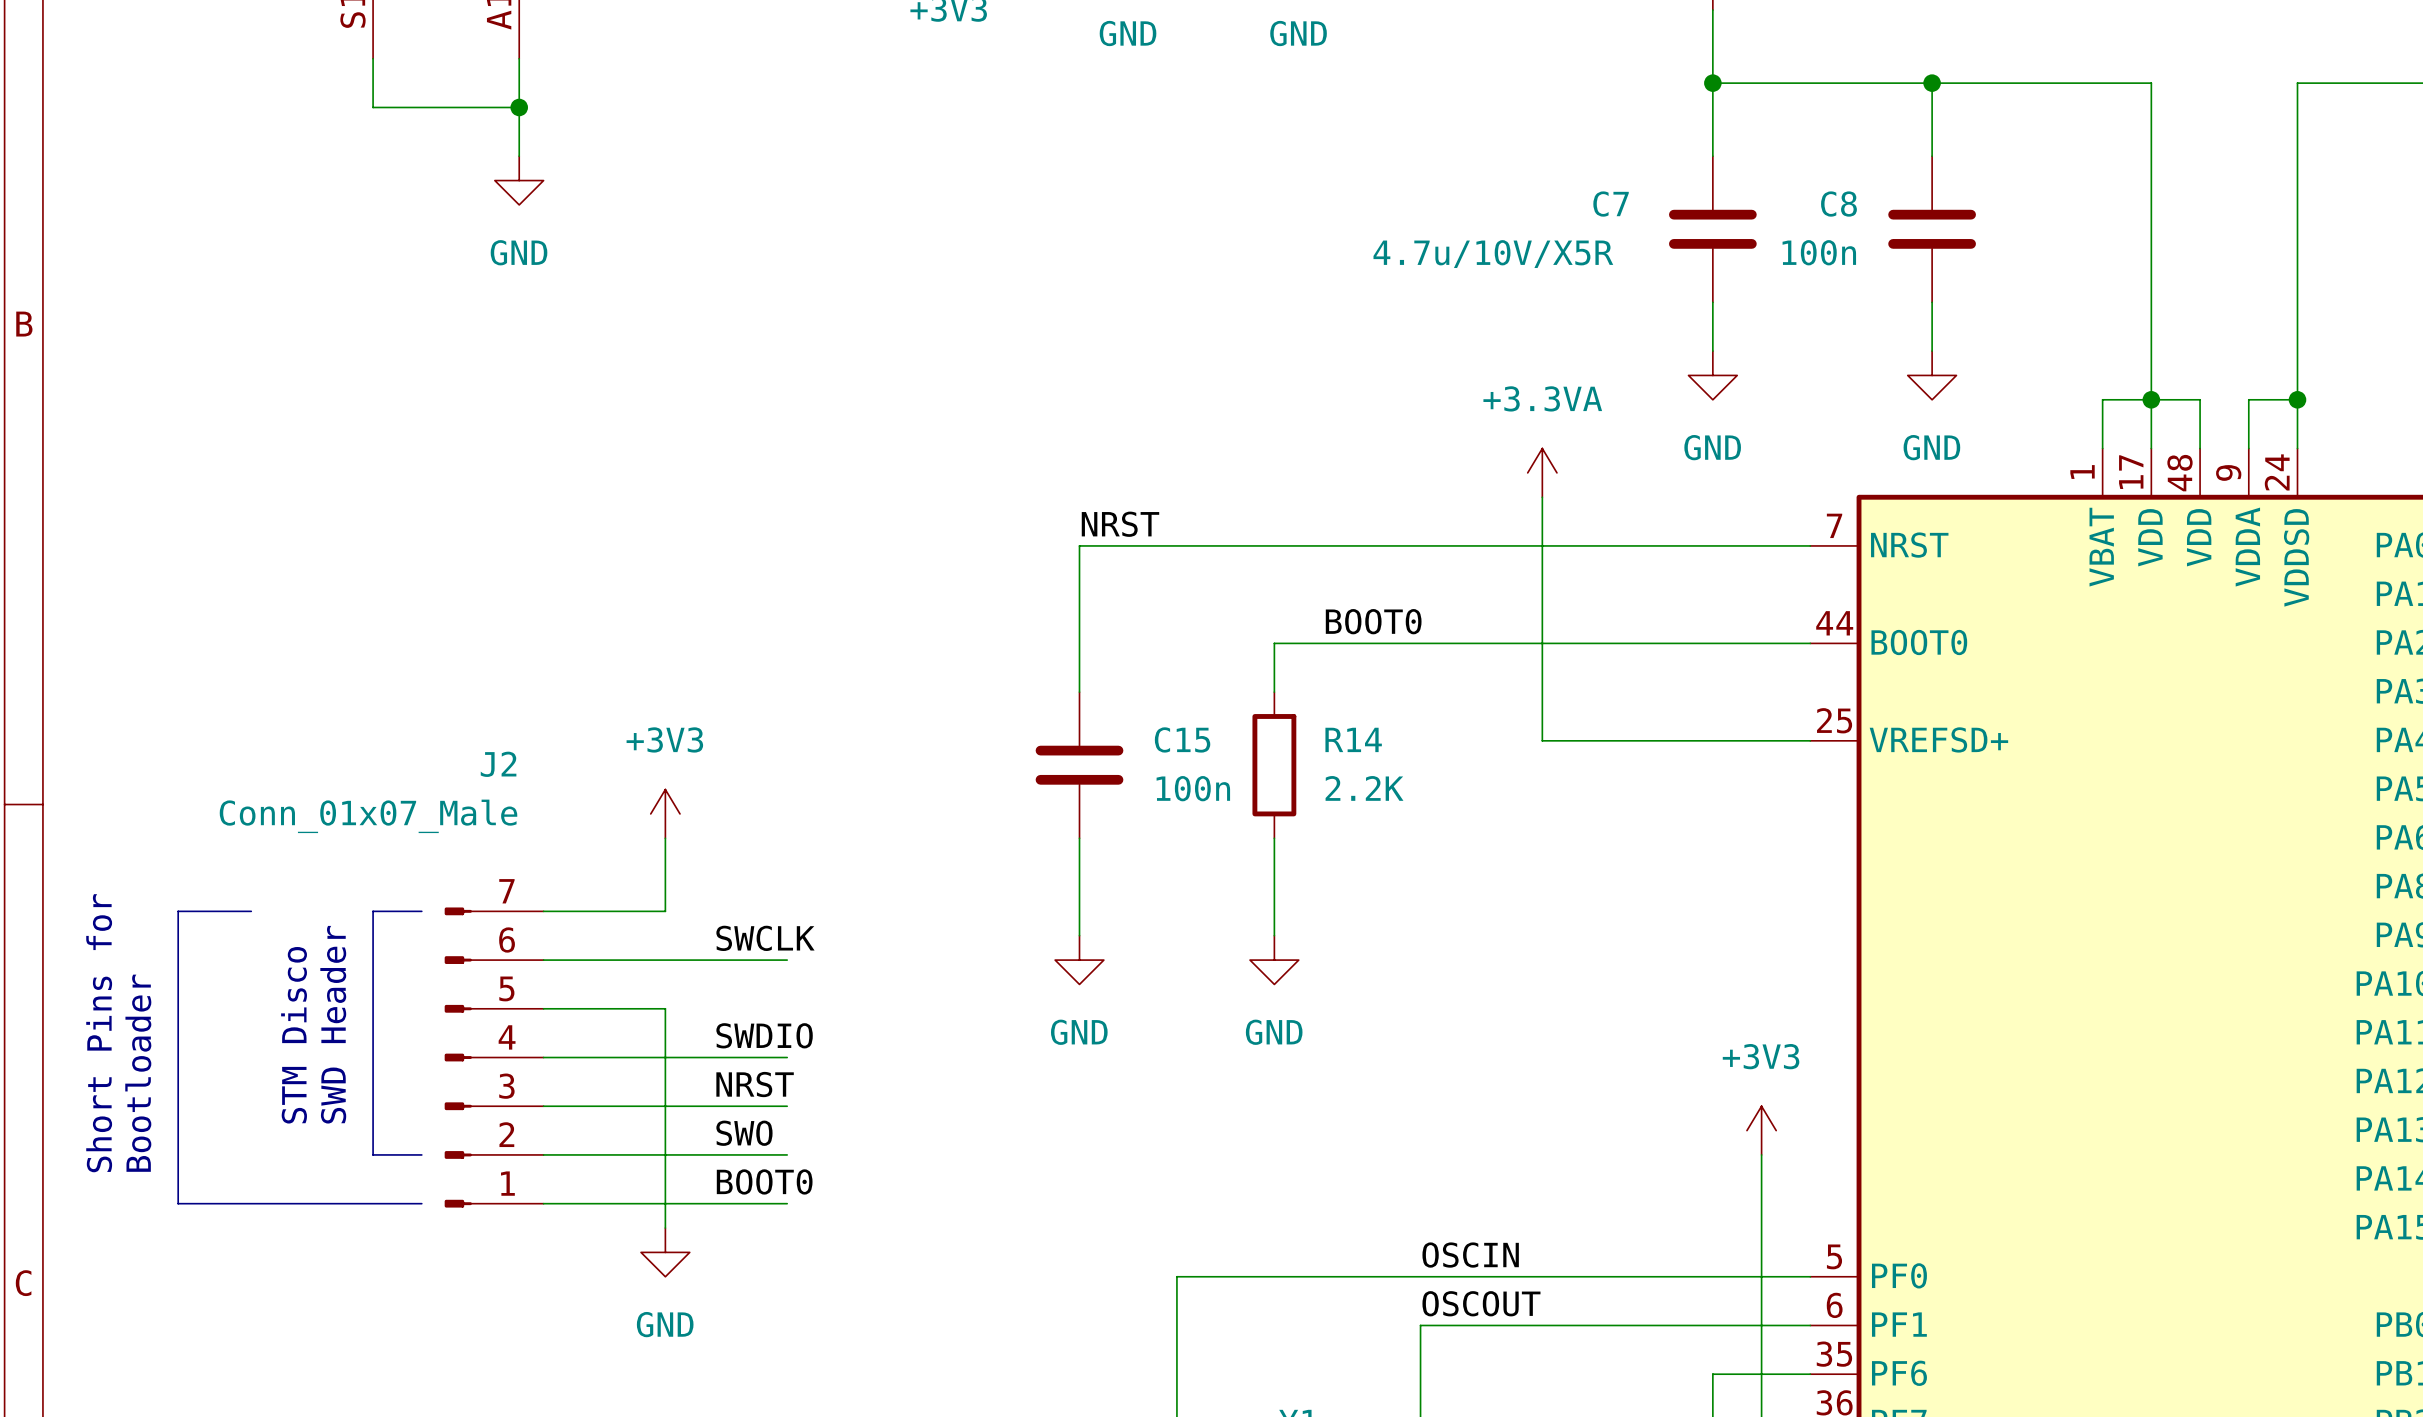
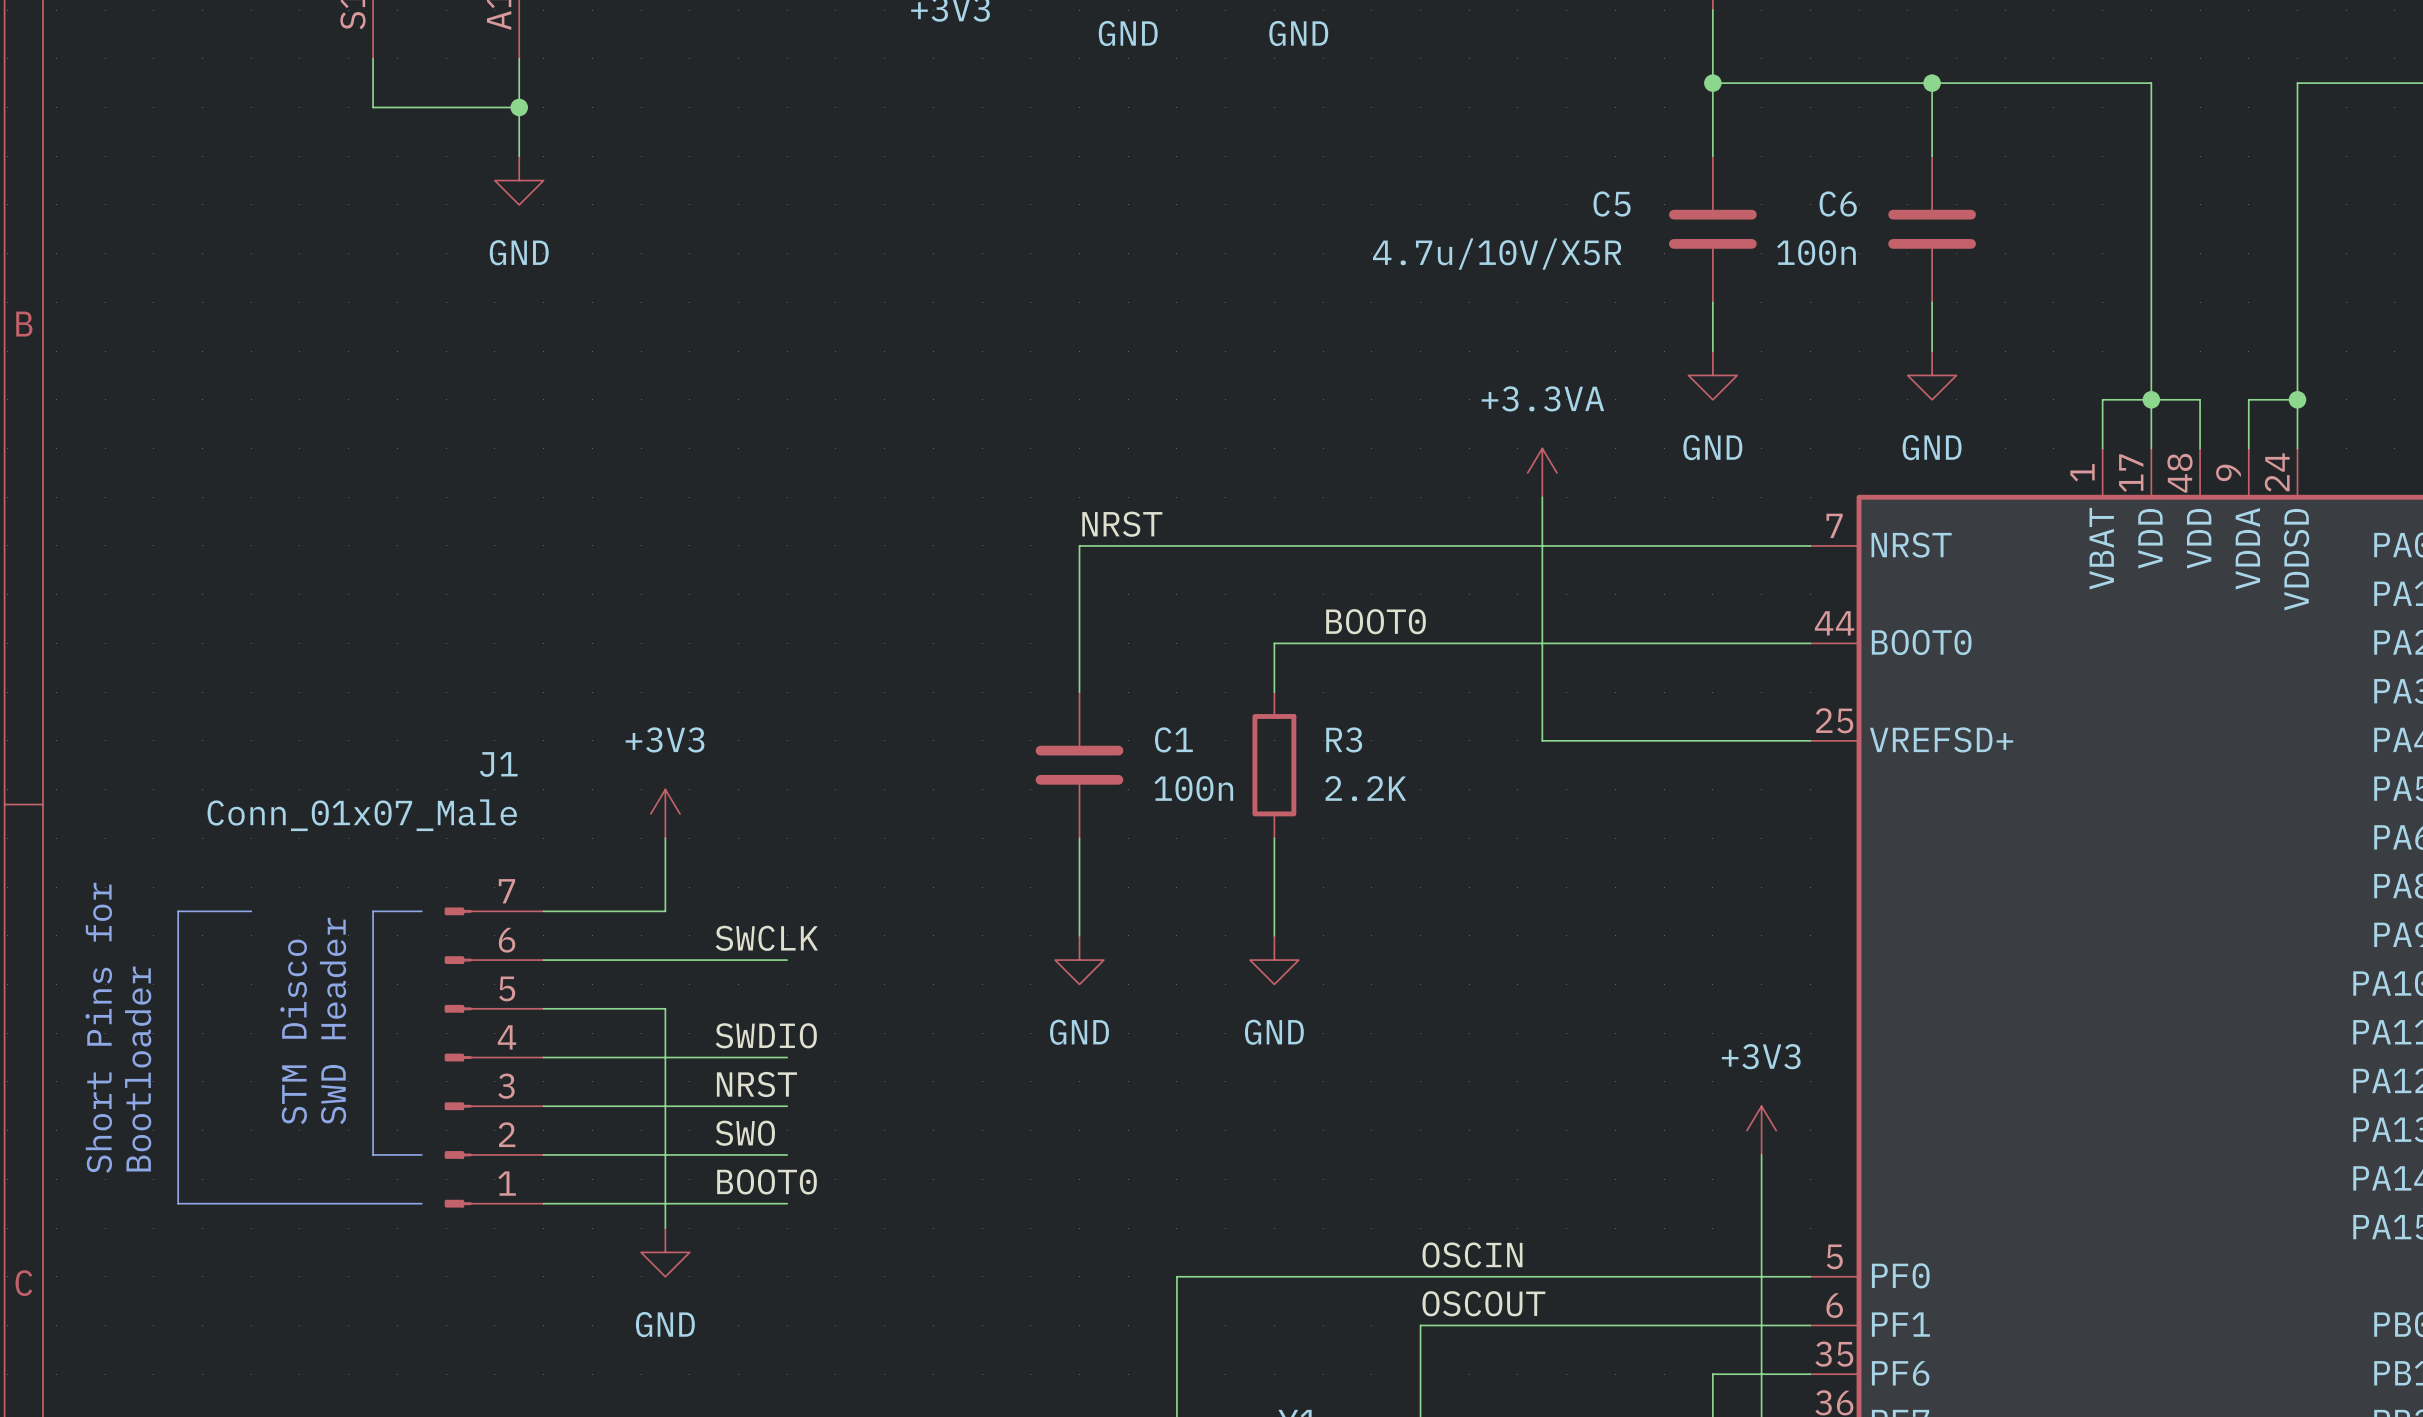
C7 name: C7 (1611, 204) -> C5 (1612, 204)
C8 name: C8 (1838, 204) -> C6 (1838, 204)
C15 name: C15 (1182, 739) -> C1 (1173, 739)
R14 name: R14 (1353, 739) -> R3 (1344, 739)
J2 name: J2 (498, 764) -> J1 (498, 764)

